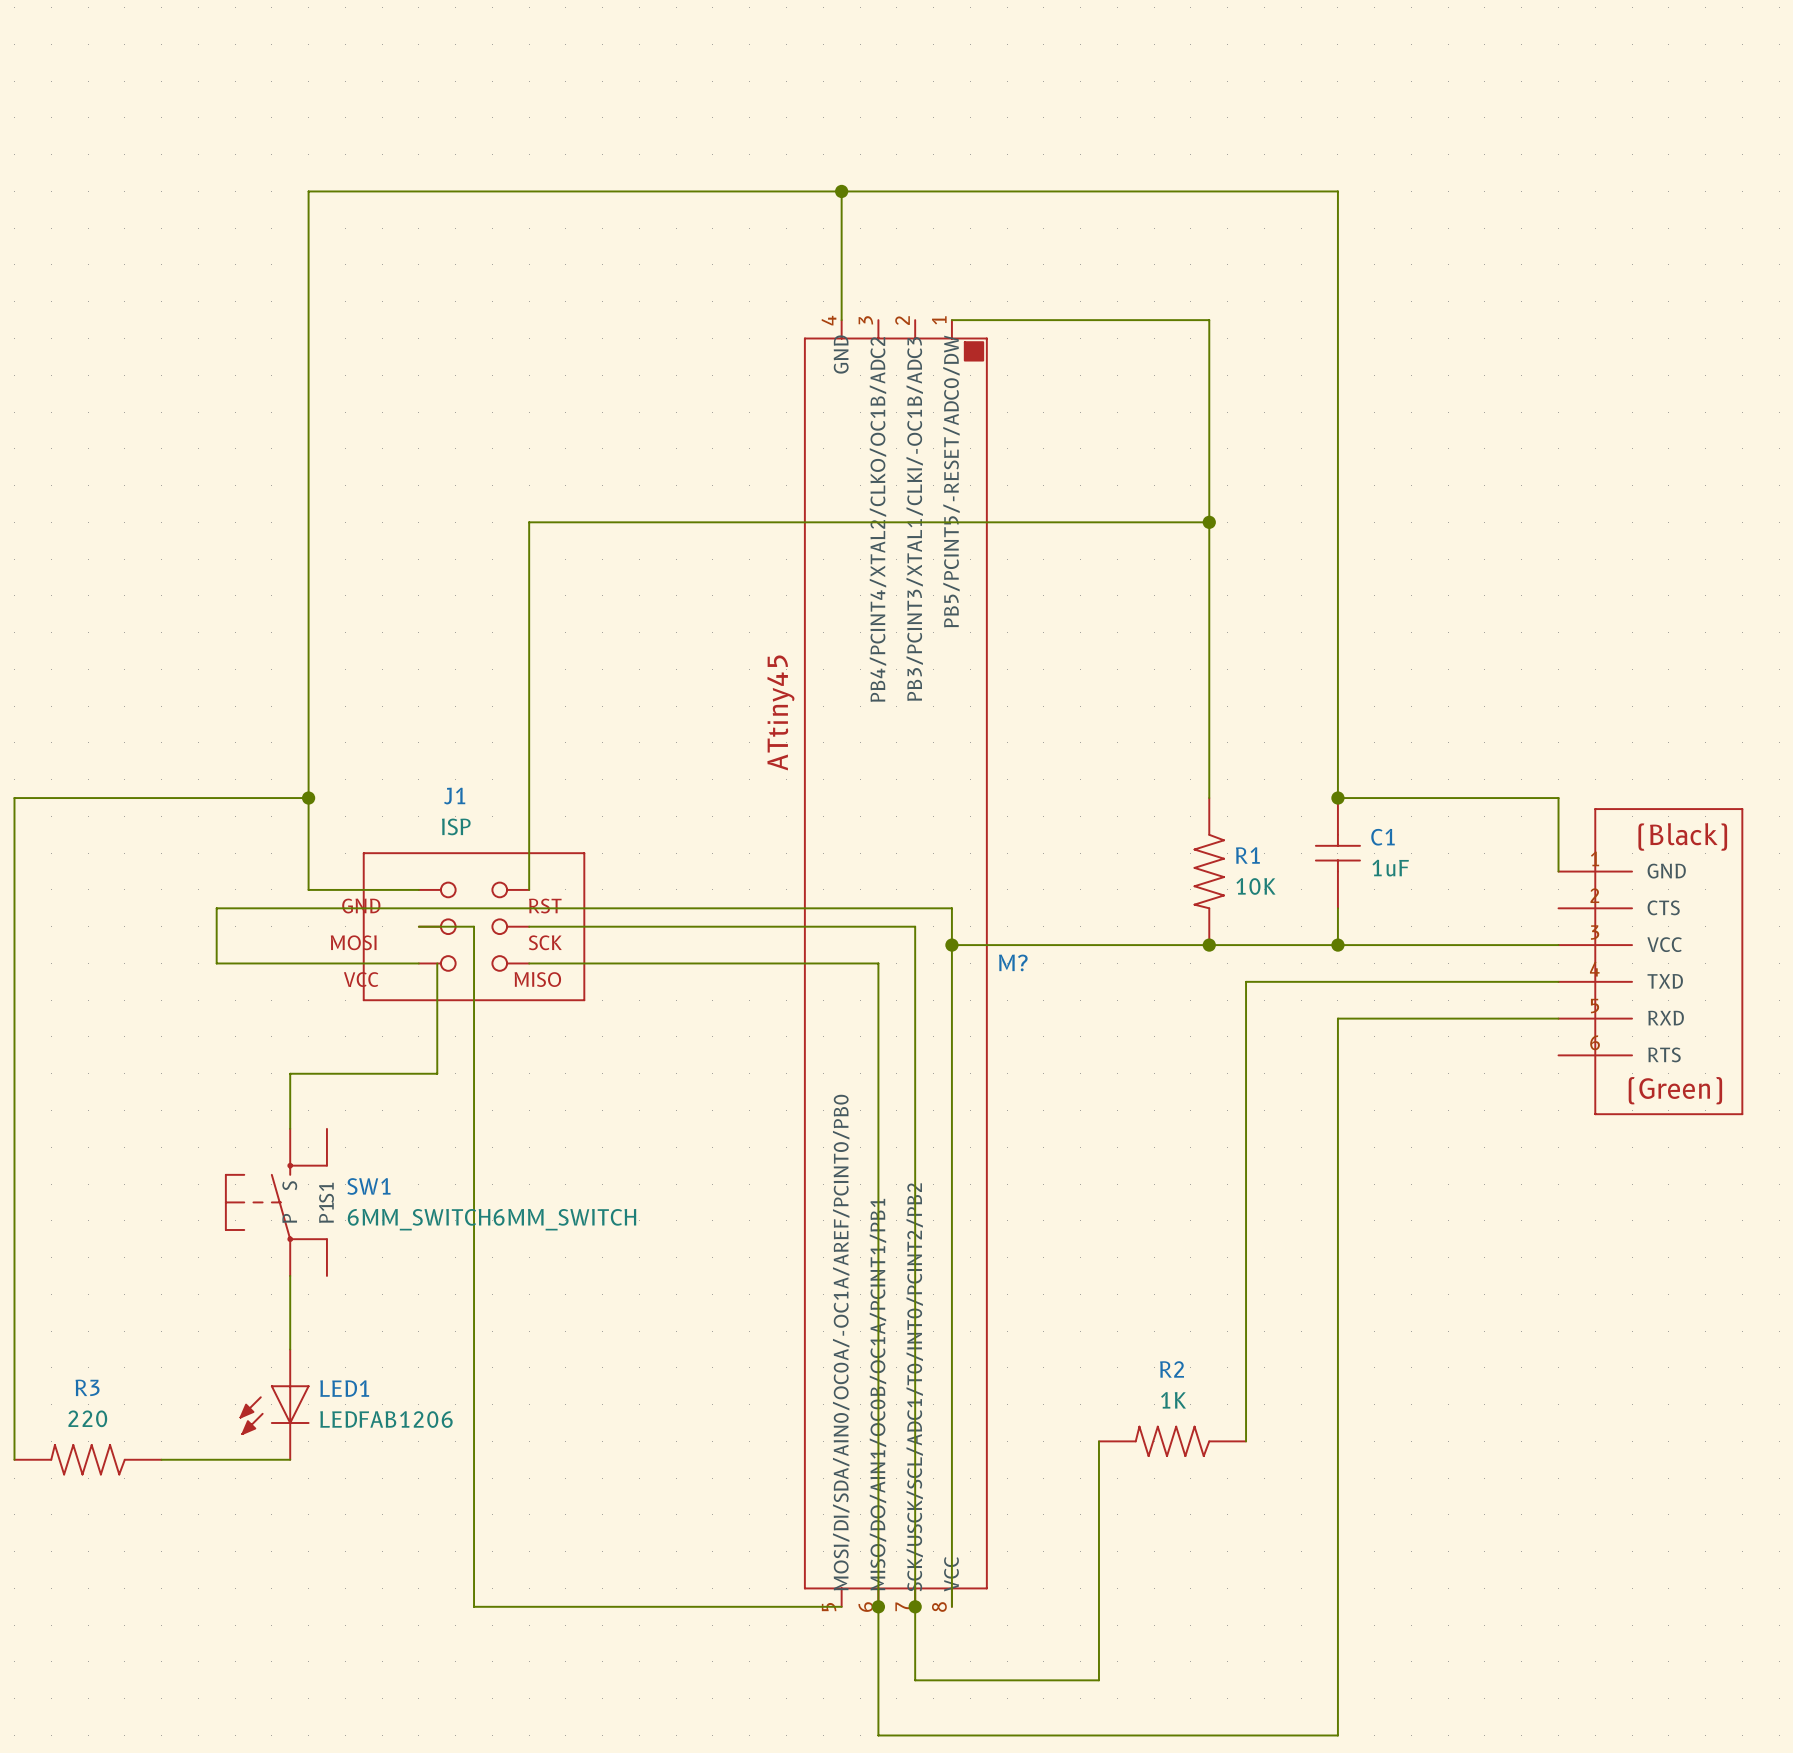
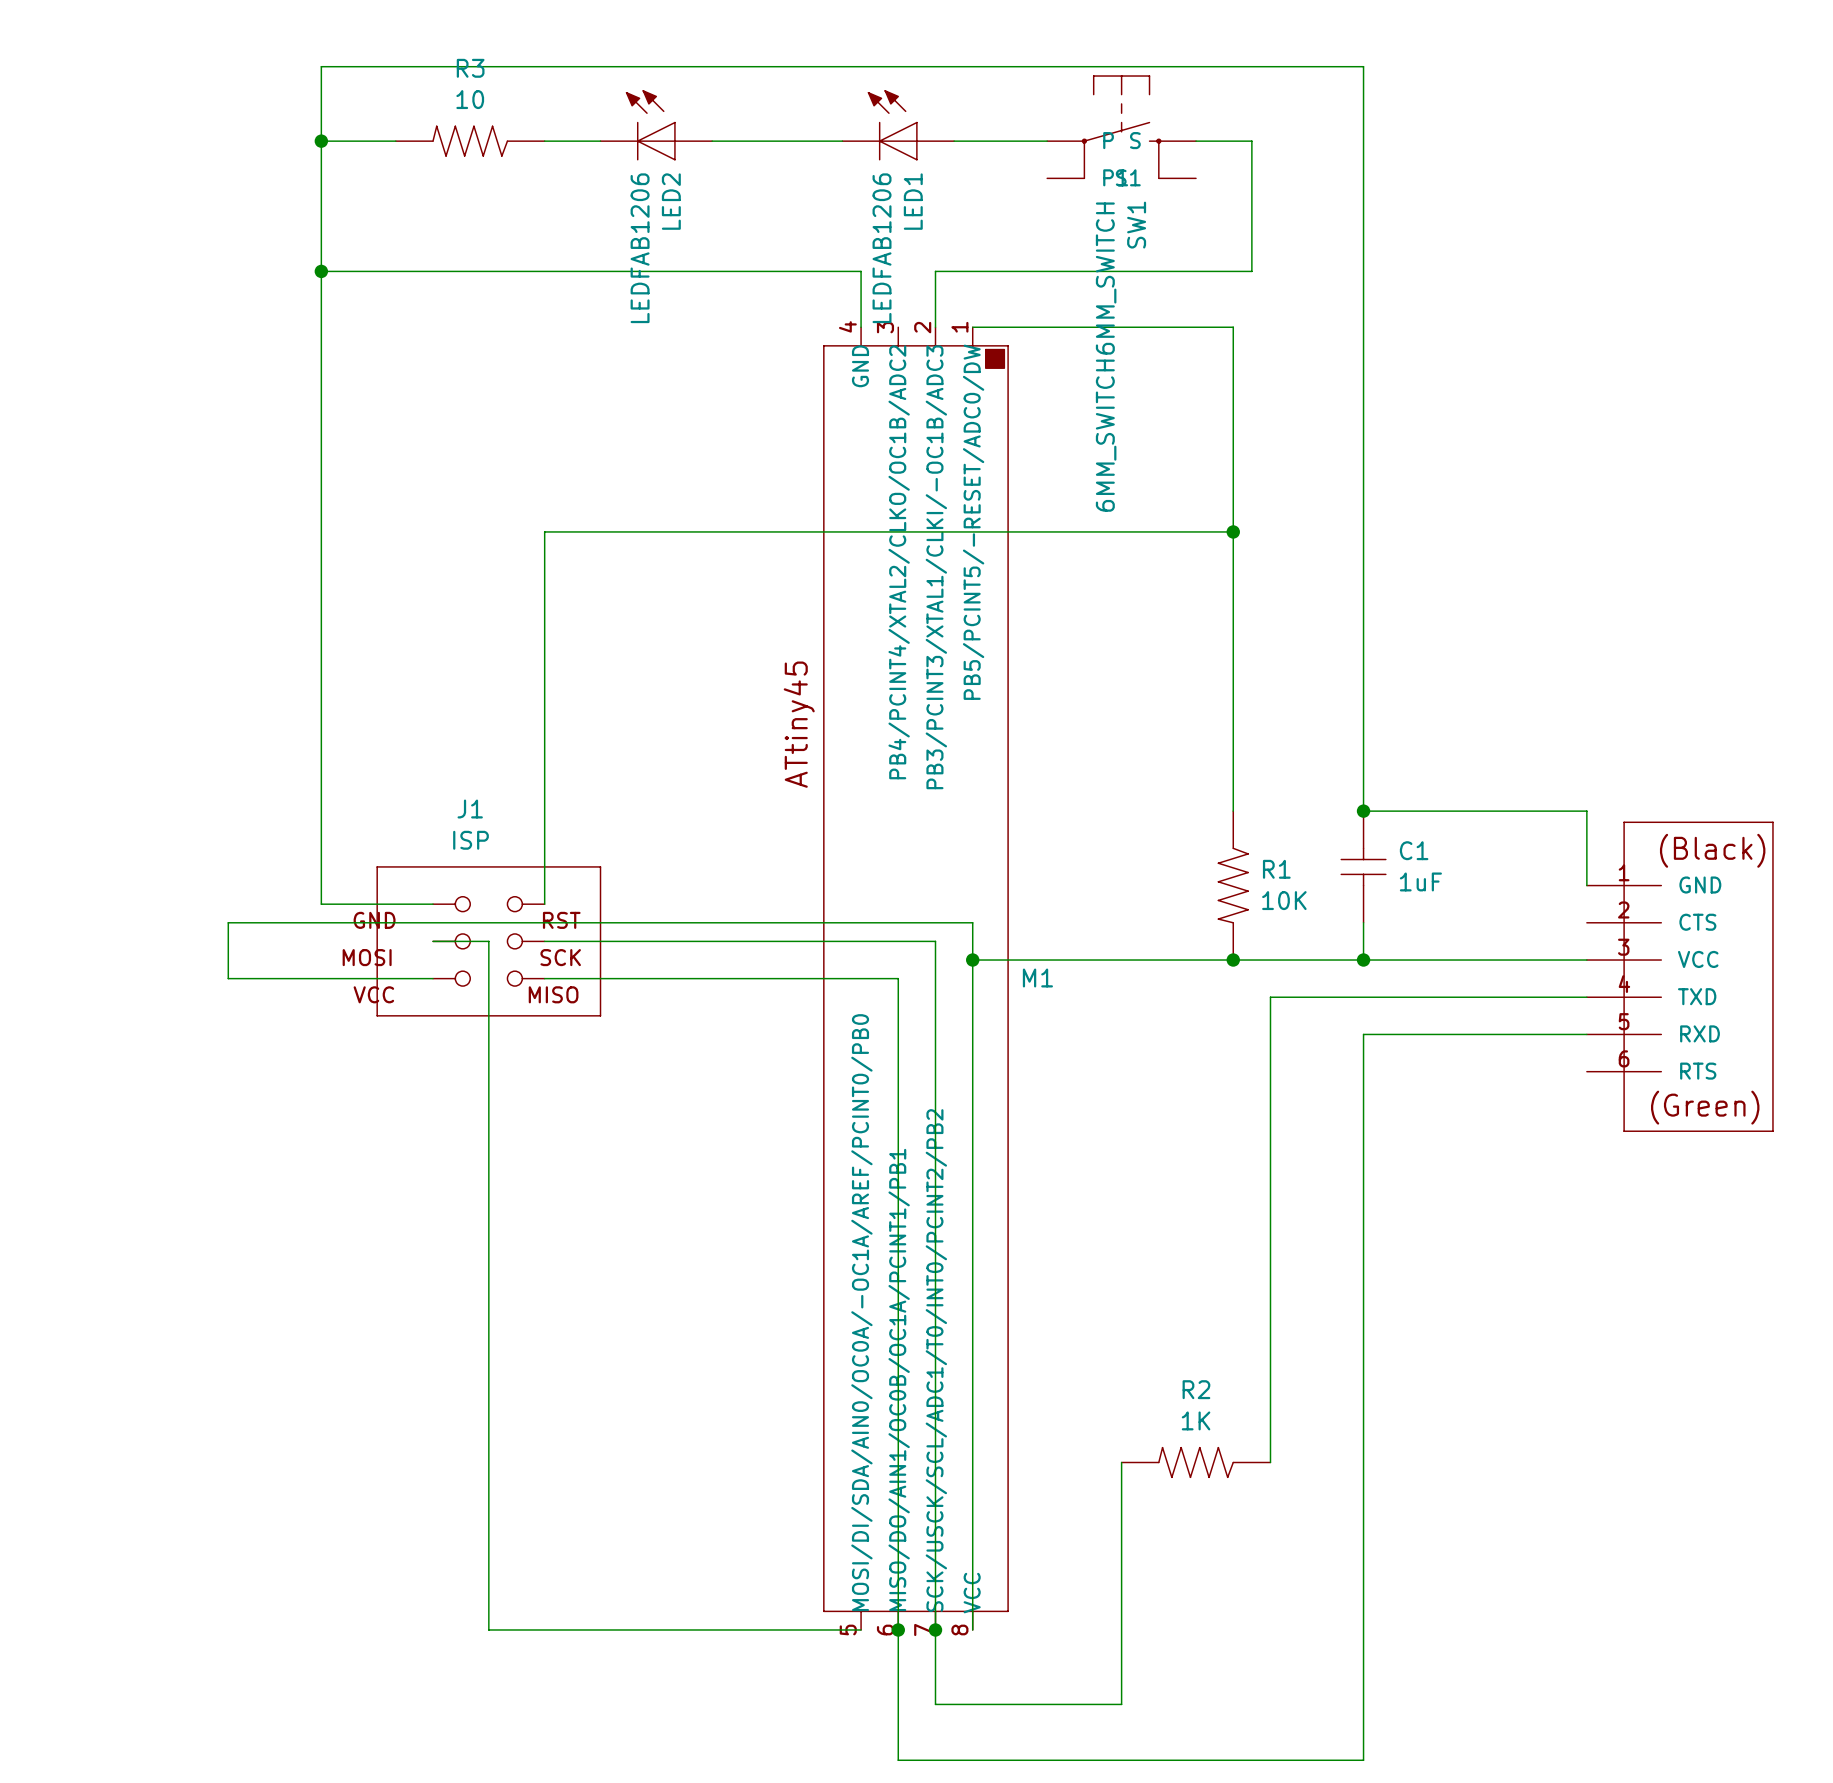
LED2: none -> LEDFAB1206 (656, 125)
wire: none -> (321, 141) (395, 141)
junction: none -> (321, 141)
wire: none -> (544, 141) (600, 141)
wire: none -> (712, 141) (842, 141)
wire: none -> (954, 141) (1047, 141)
wire: none -> (1196, 141) (1251, 141) (1251, 271) (935, 271) (935, 327)
wire: (308, 191) (1337, 191) -> (321, 196) (321, 66) (1363, 66) (1363, 196)
wire: (841, 191) (841, 264) -> (321, 271) (861, 271)
junction: (841, 191) -> none
junction: none -> (321, 271)
wire: (308, 798) (14, 798) (14, 1459) -> none
junction: (308, 798) -> none
M? name: M? (1013, 962) -> M1 (1037, 977)
wire: (437, 963) (437, 1073) (290, 1073) (290, 1128) -> none
SW1 rotation: 0° (276, 1202) -> 90° clockwise (1121, 127)
SW1 position: (276, 1202) -> (1121, 127)
wire: (290, 1275) (290, 1349) -> none
LED1 position: (274, 1404) -> (898, 125)
LED1 rotation: 0° (274, 1410) -> 90° clockwise (892, 125)
R3 value: 220 (87, 1418) -> 10 (470, 99)
R3 position: (88, 1459) -> (470, 141)
wire: (161, 1459) (290, 1459) -> none

